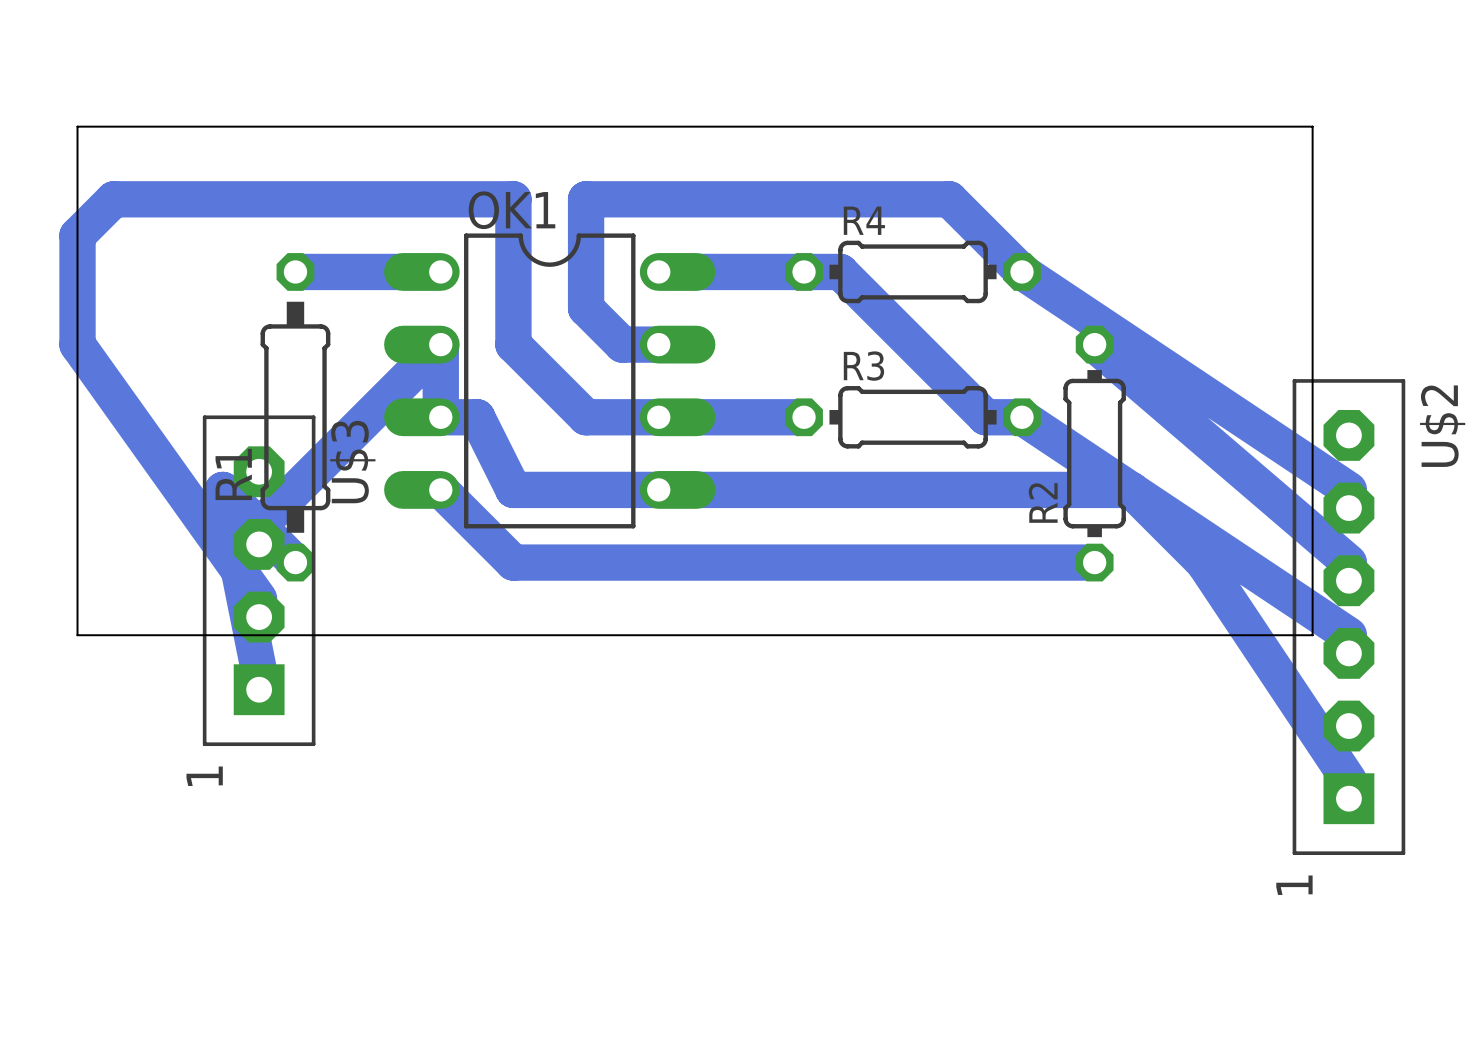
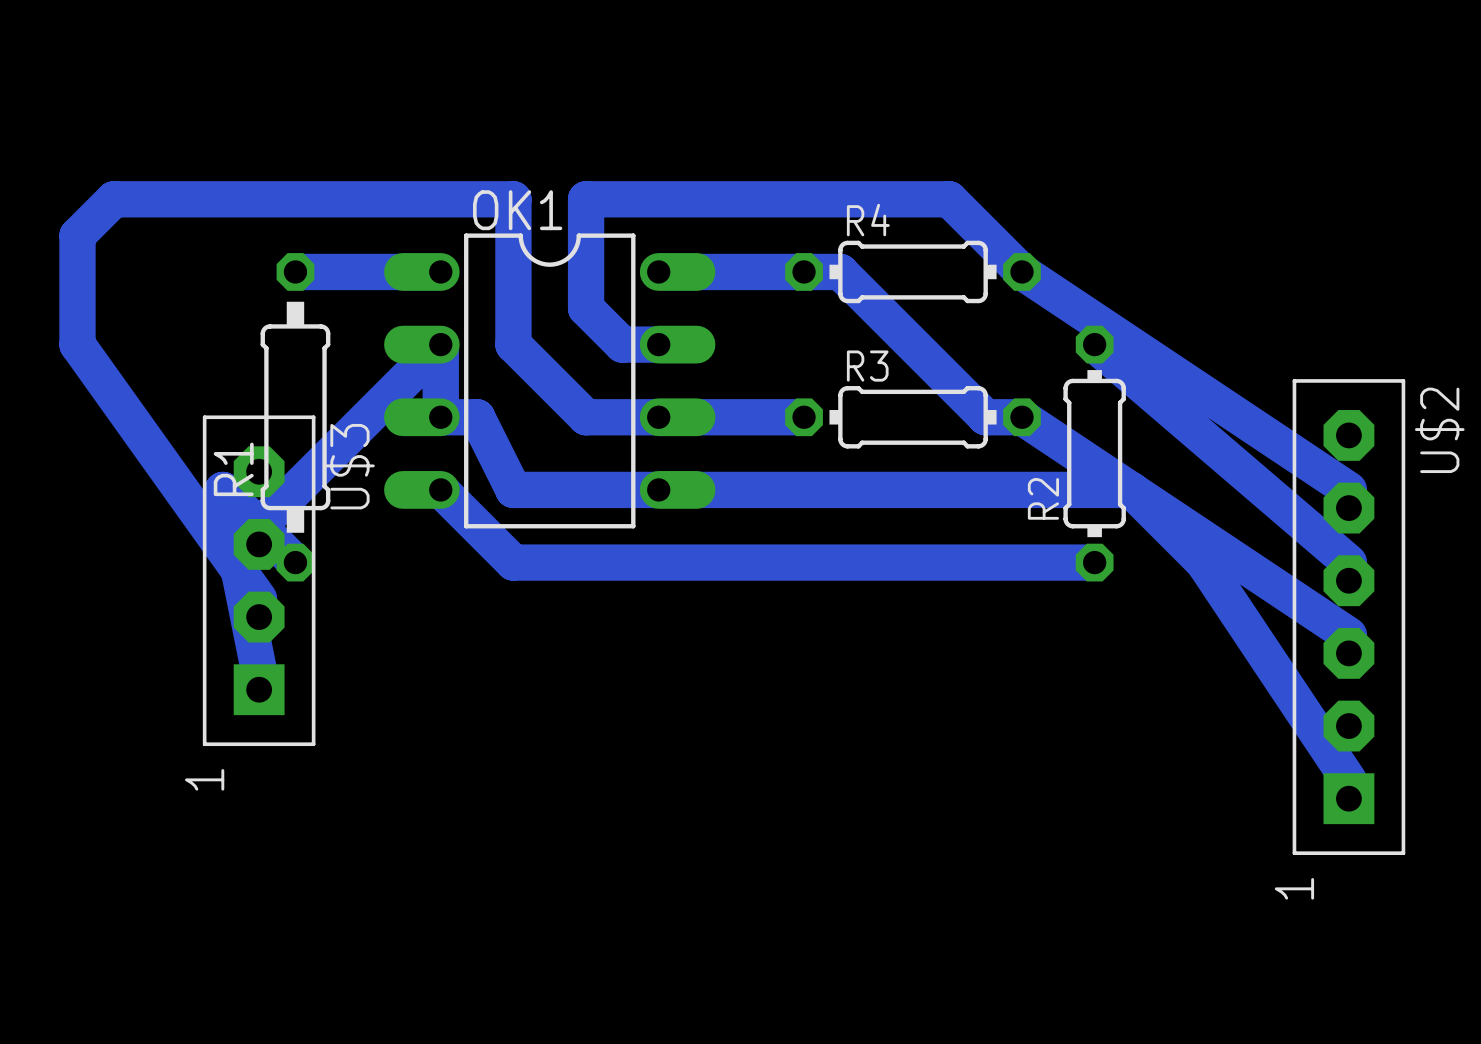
board edge: (77, 126) (1312, 126) (1312, 635) (77, 635) (77, 126) -> none

